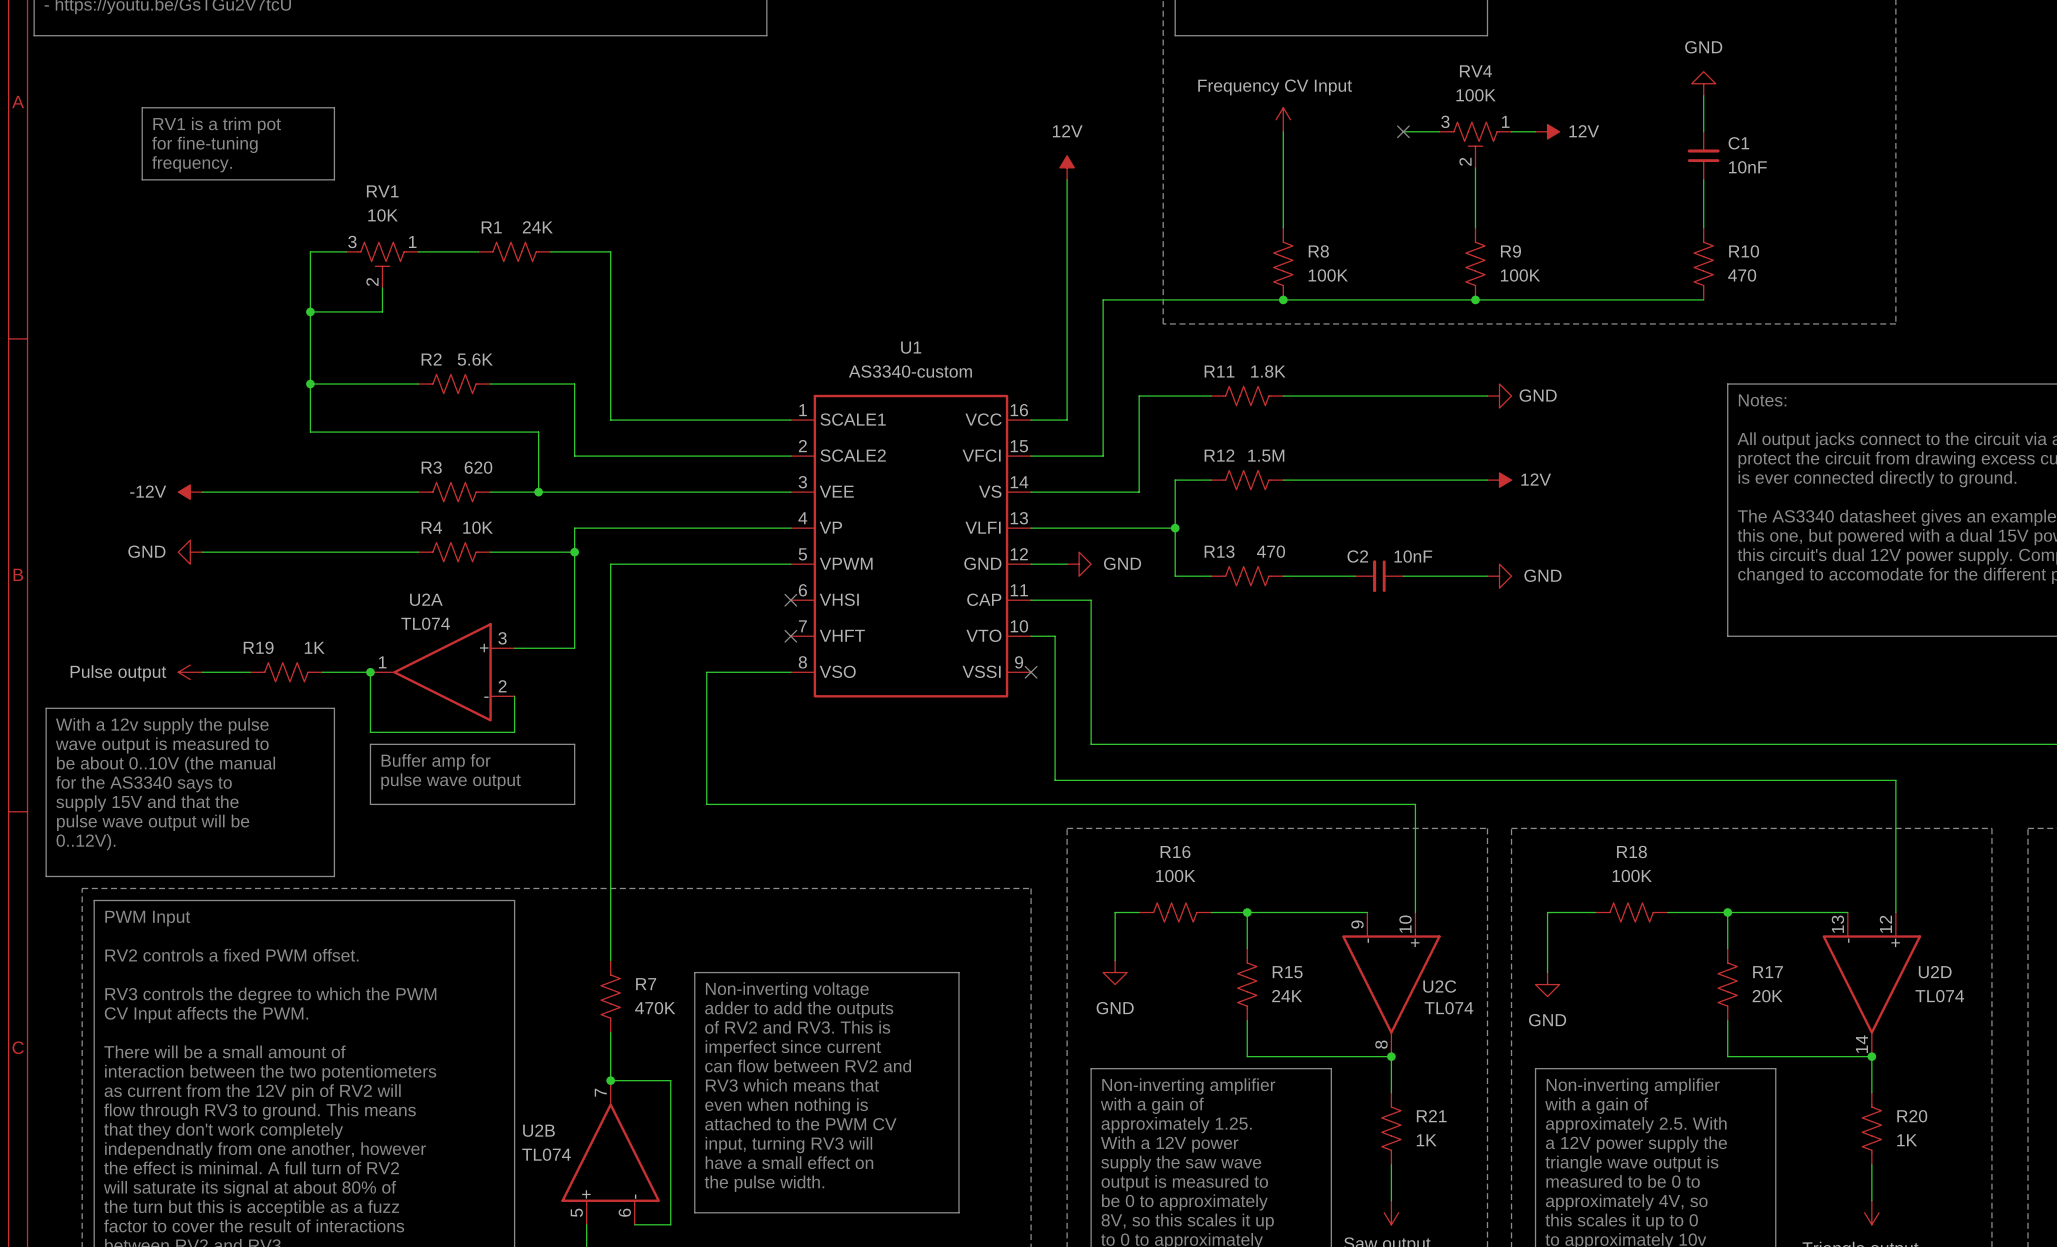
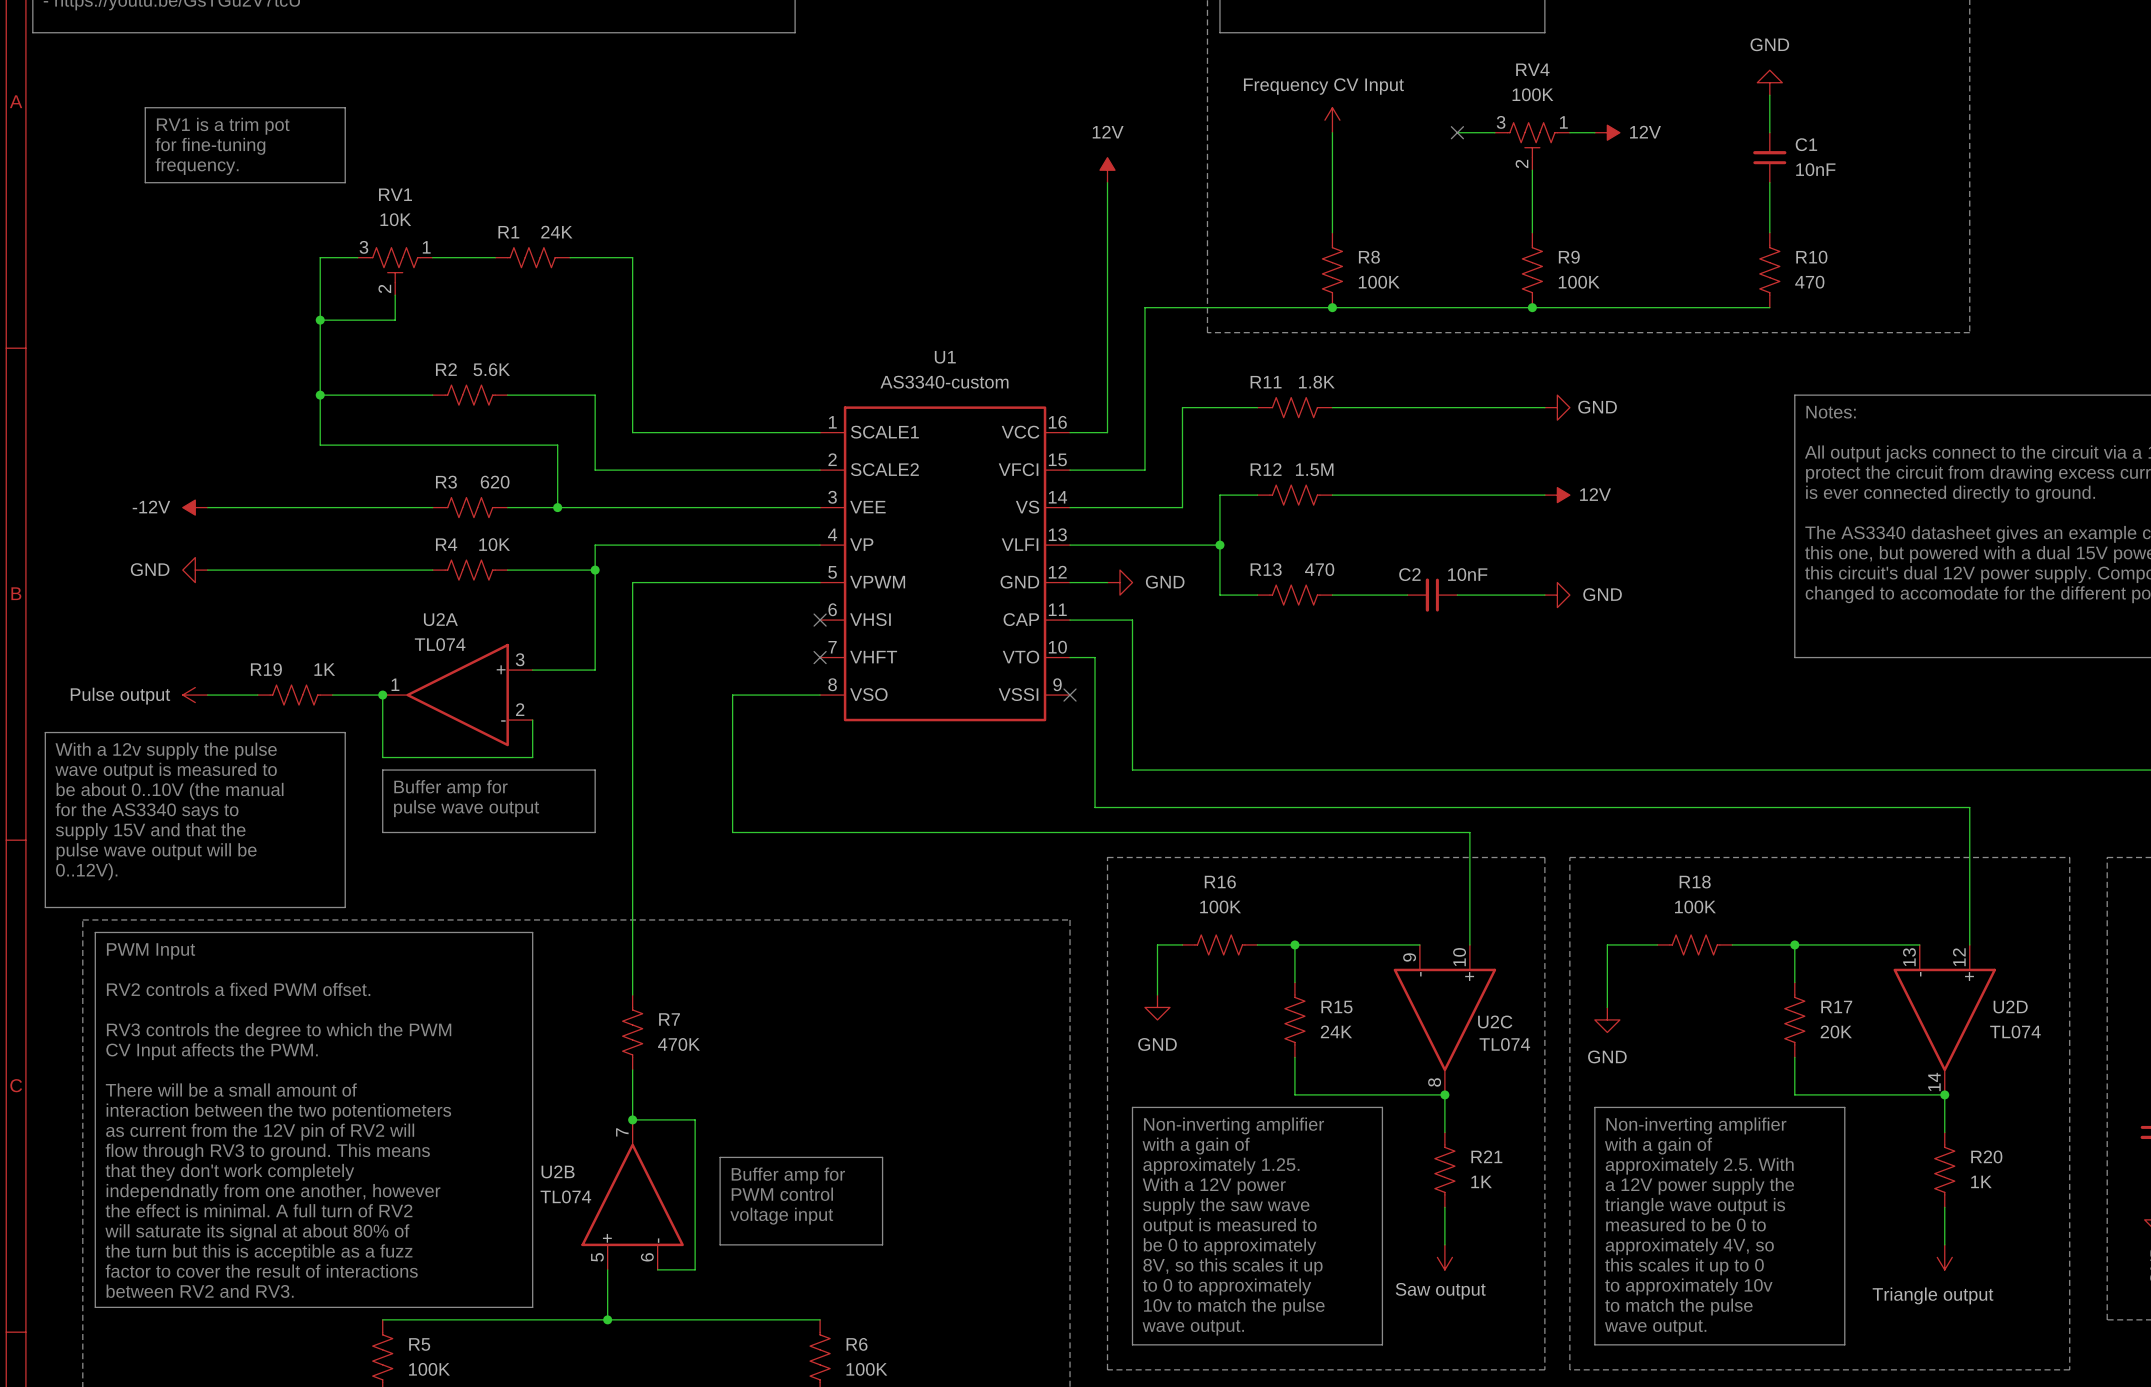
text: Non-inverting voltage (787, 990) -> none
text: adder to add the outputs (799, 1009) -> none
text: of RV2 and RV3. This is (797, 1027) -> none
text: imperfect since current (793, 1048) -> none
text: can flow between RV2 and (808, 1065) -> none
text: RV3 which means that (792, 1085) -> none
text: even when nothing is (786, 1106) -> none
line: (694, 1116) (694, 972) (959, 972) (959, 1212) (694, 1212) (694, 1200) -> (720, 1157) (882, 1157) (882, 1244) (720, 1244)
text: attached to the PWM CV (800, 1124) -> none
text: none -> Buffer amp for (788, 1175)
text: input, turning RV3 will (788, 1145) -> none
text: none -> PWM control (782, 1194)
text: have a small effect on (789, 1162) -> none
text: none -> voltage input (781, 1216)
text: the pulse width. (764, 1183) -> none

